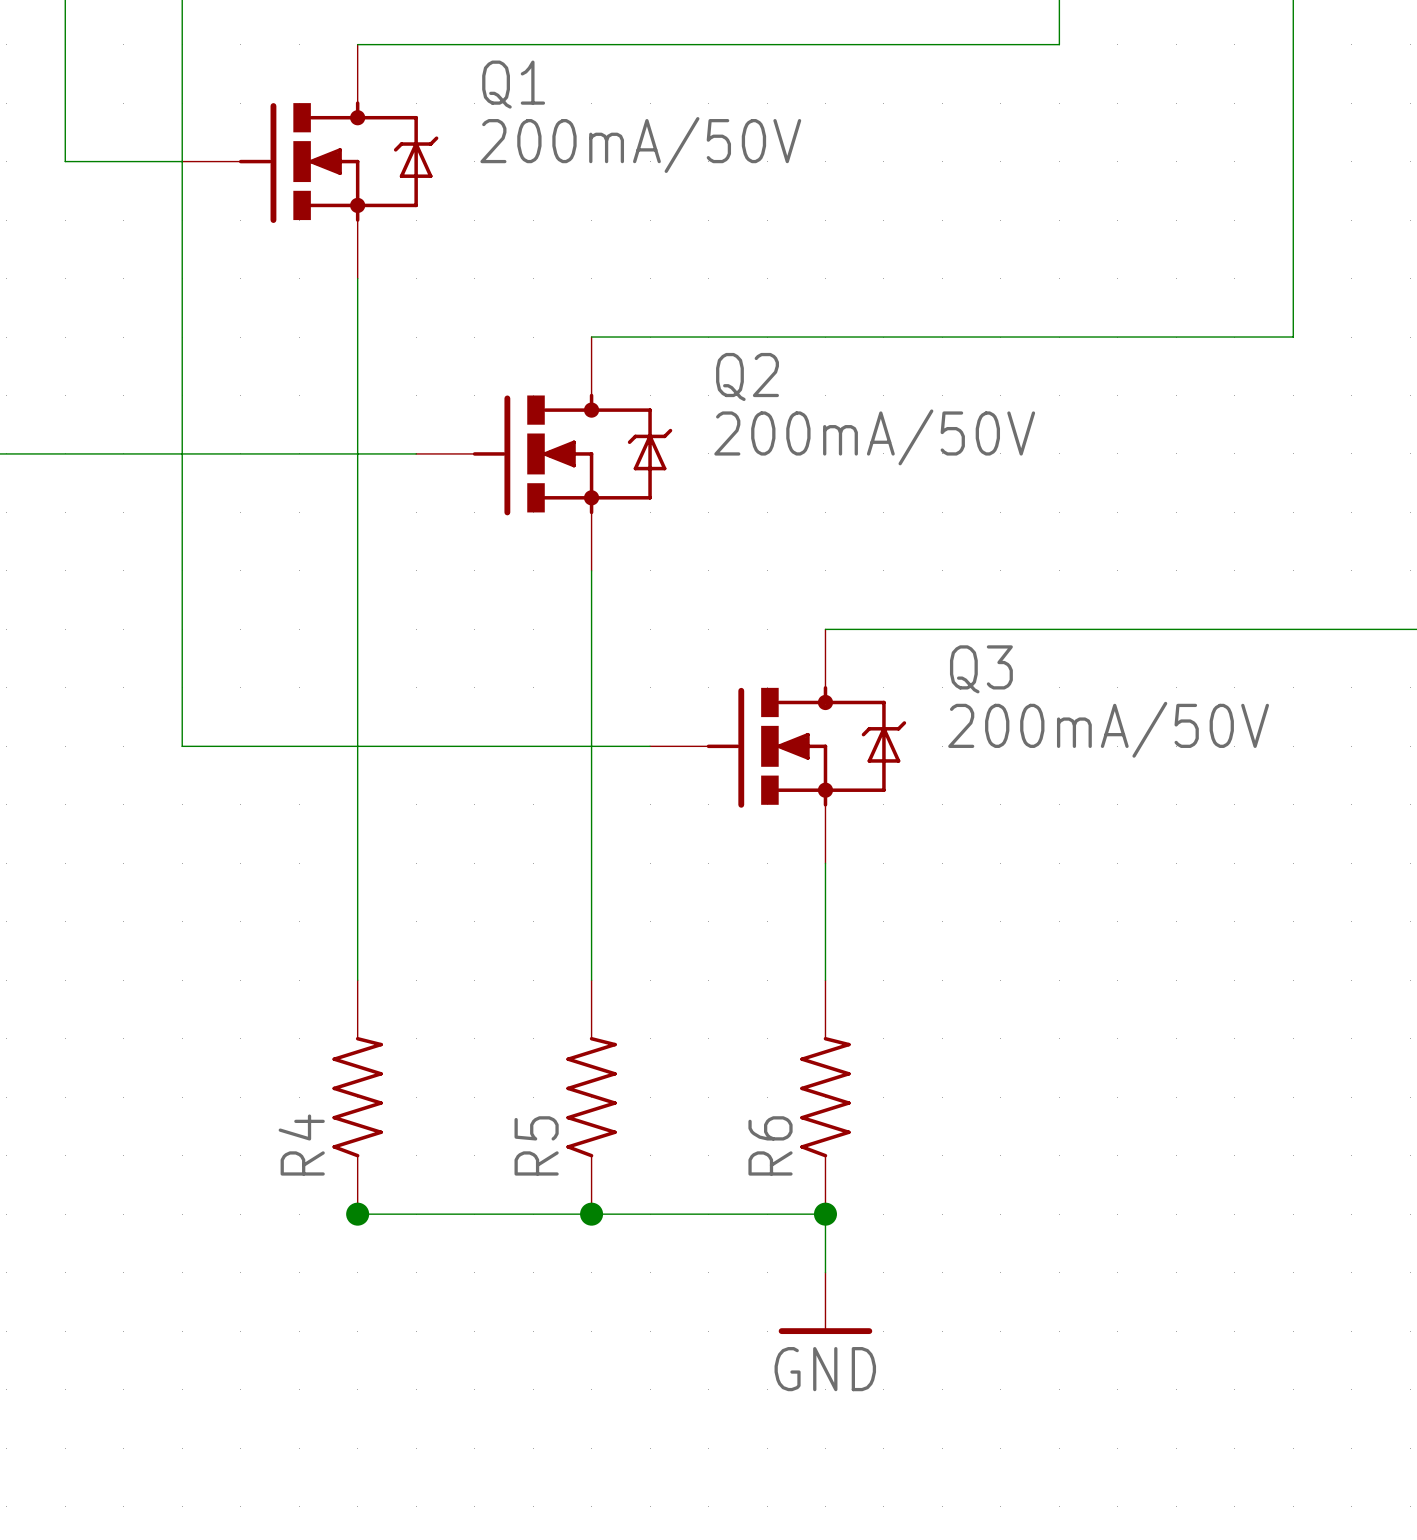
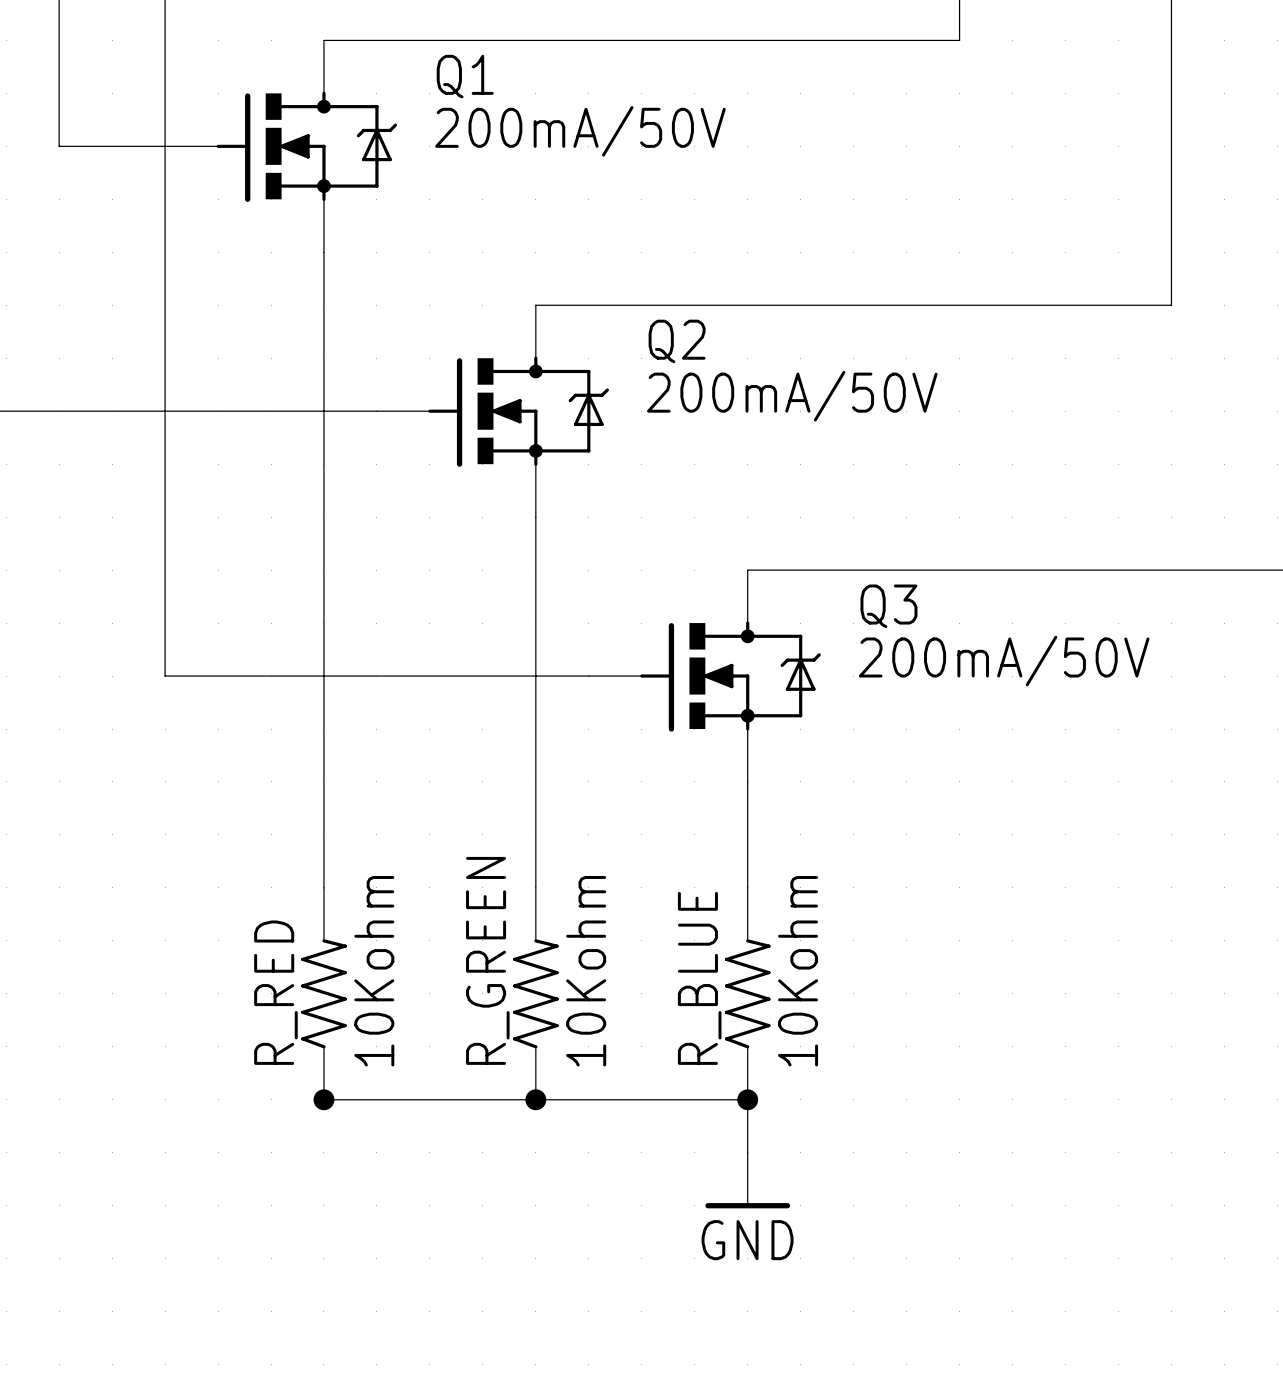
R4 value: none -> 10Kohm (374, 971)
R5 value: none -> 10Kohm (586, 971)
R6 value: none -> 10Kohm (798, 971)
R4 name: R4 (301, 1145) -> R_RED (275, 992)
R5 name: R5 (536, 1145) -> R_GREEN (487, 960)
R6 name: R6 (770, 1145) -> R_BLUE (699, 978)

